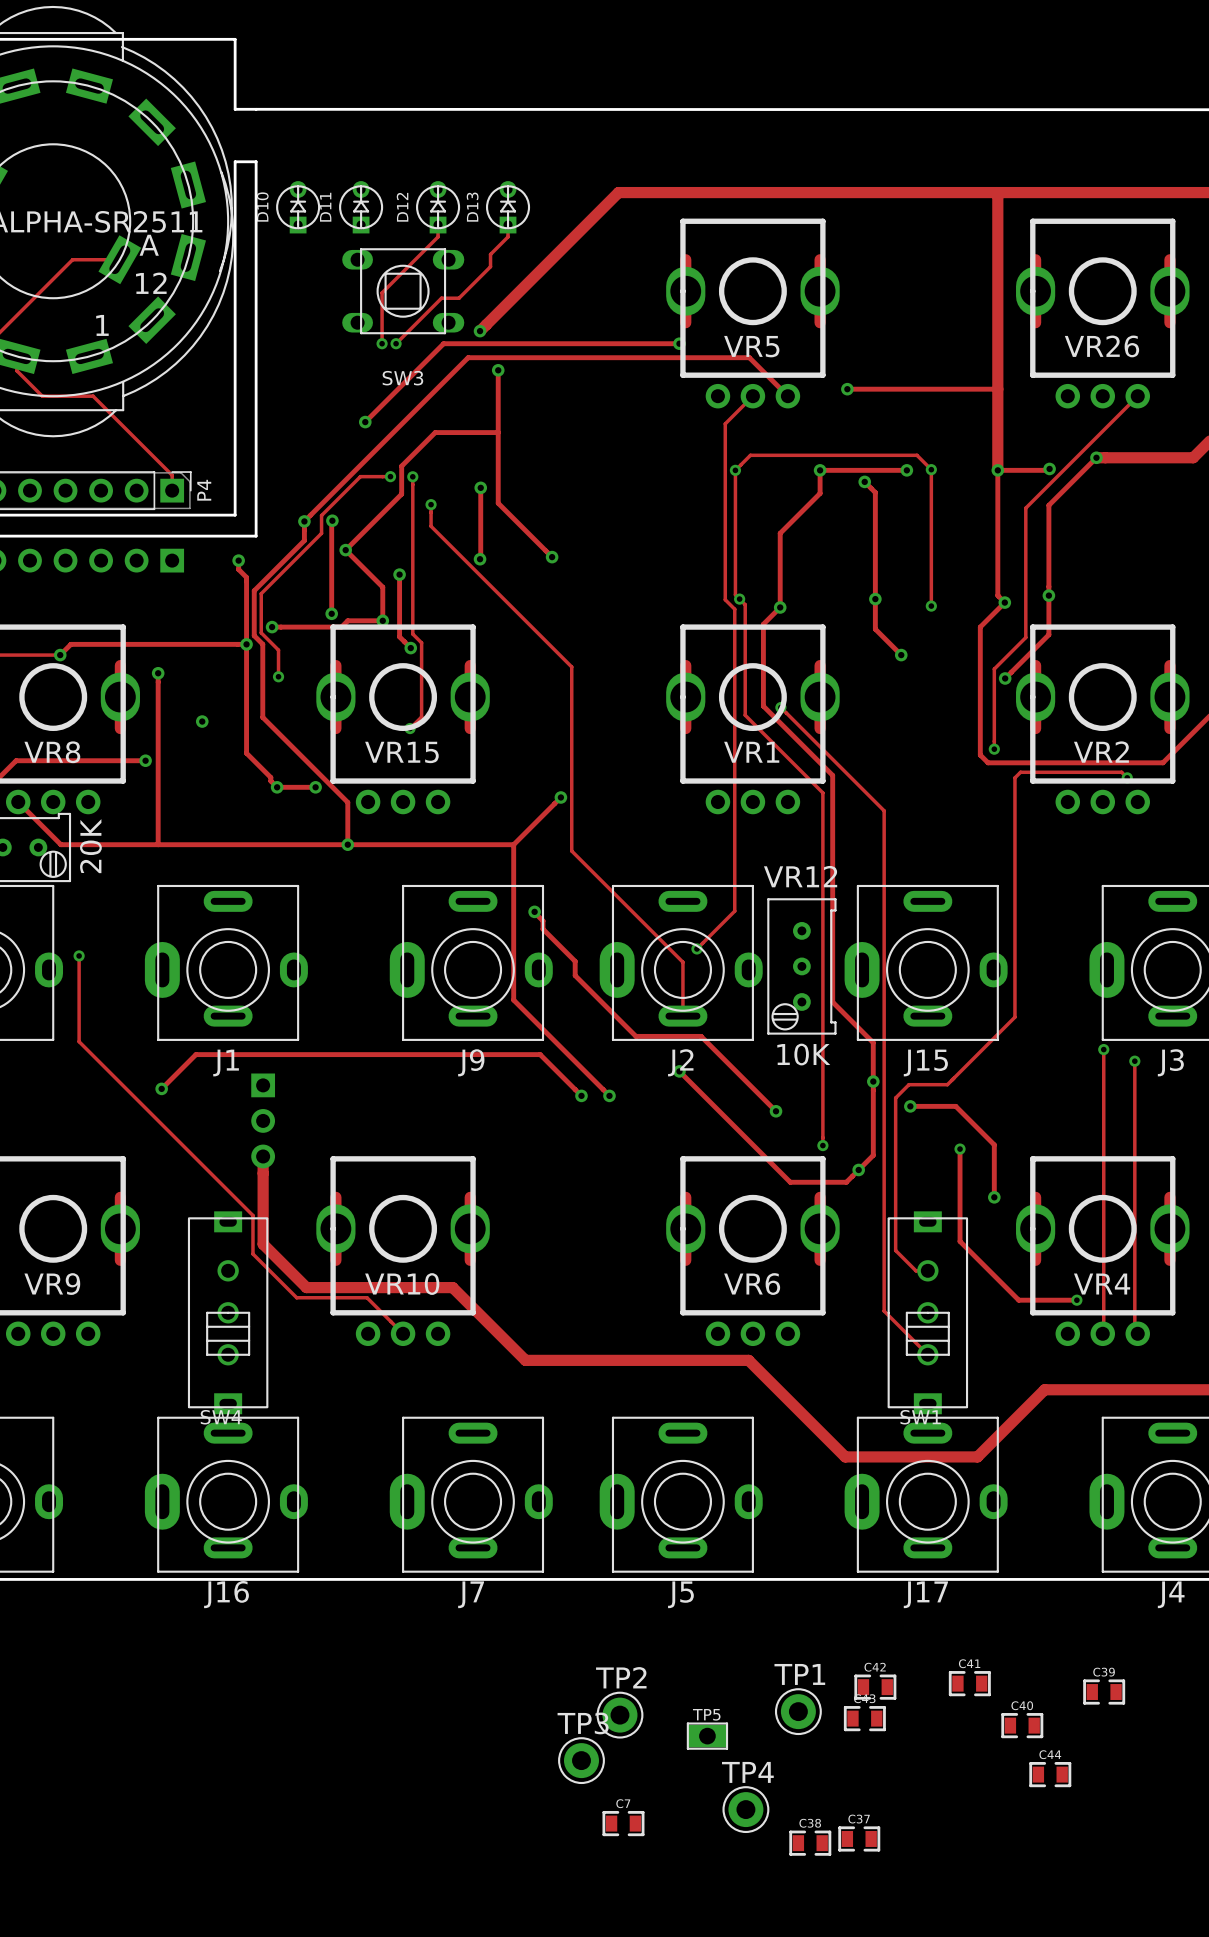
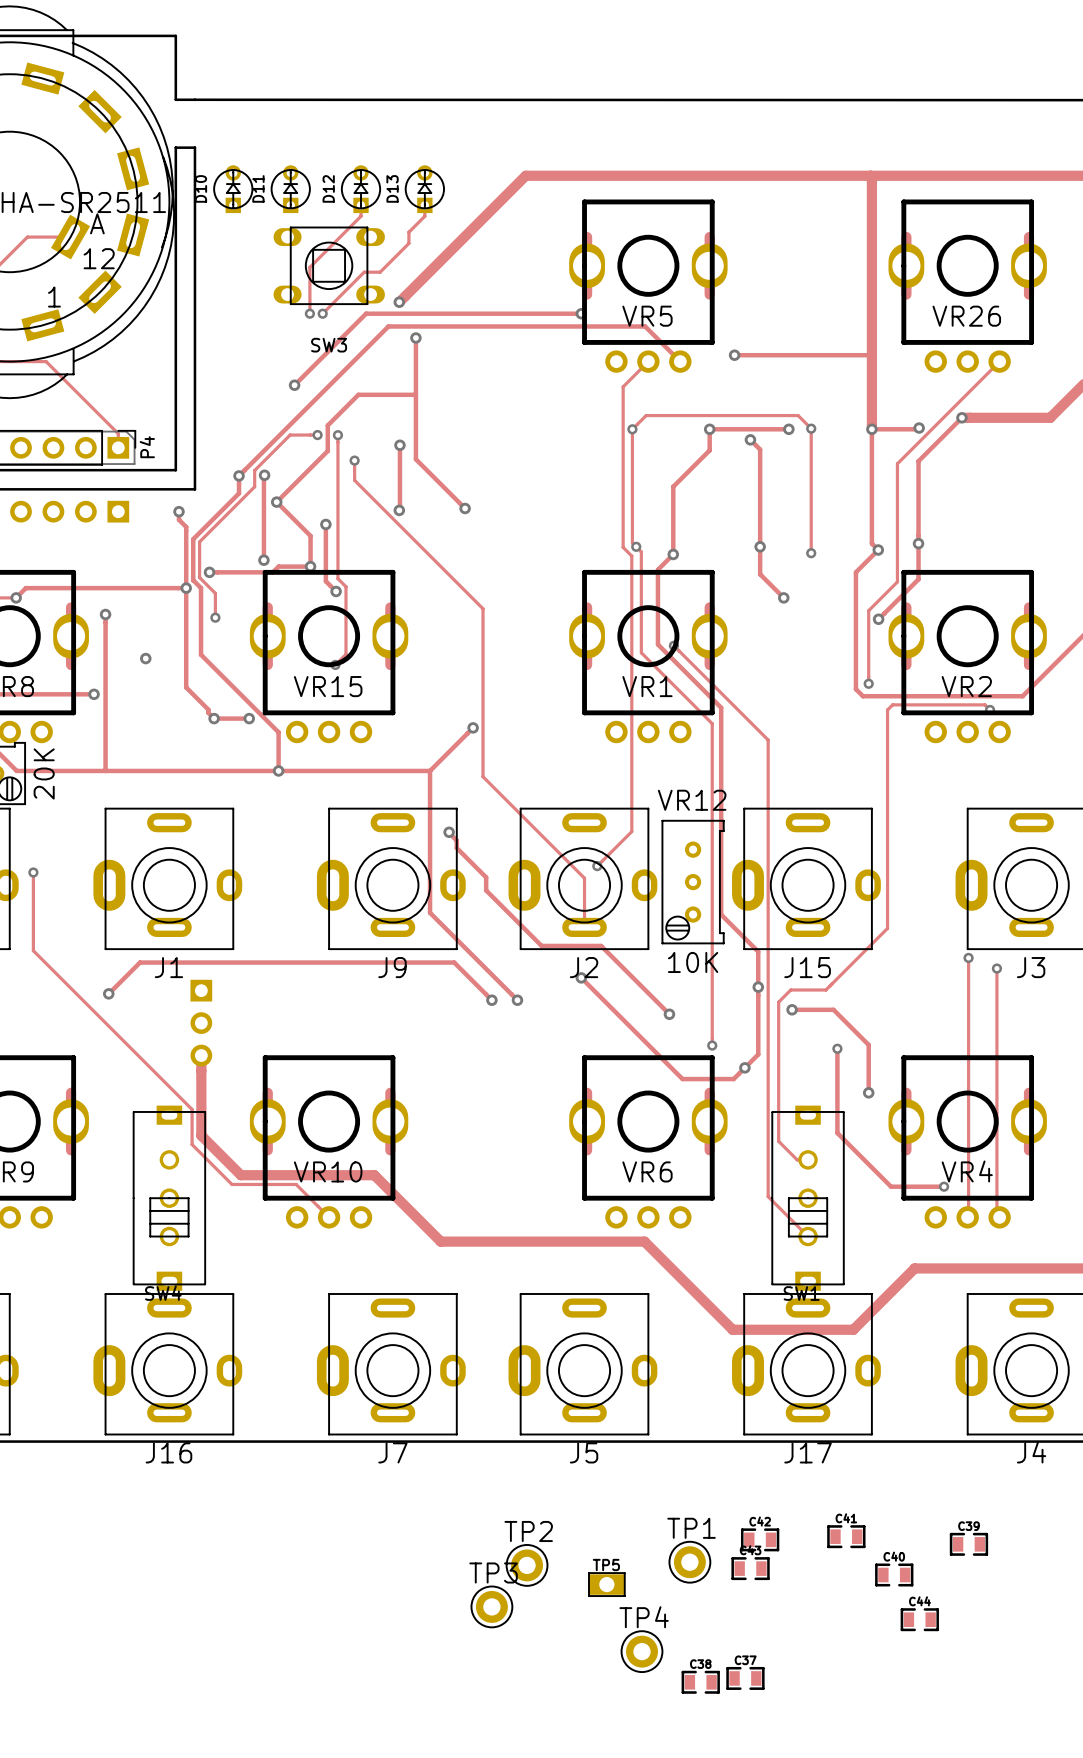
C7: (623, 1823) -> none

